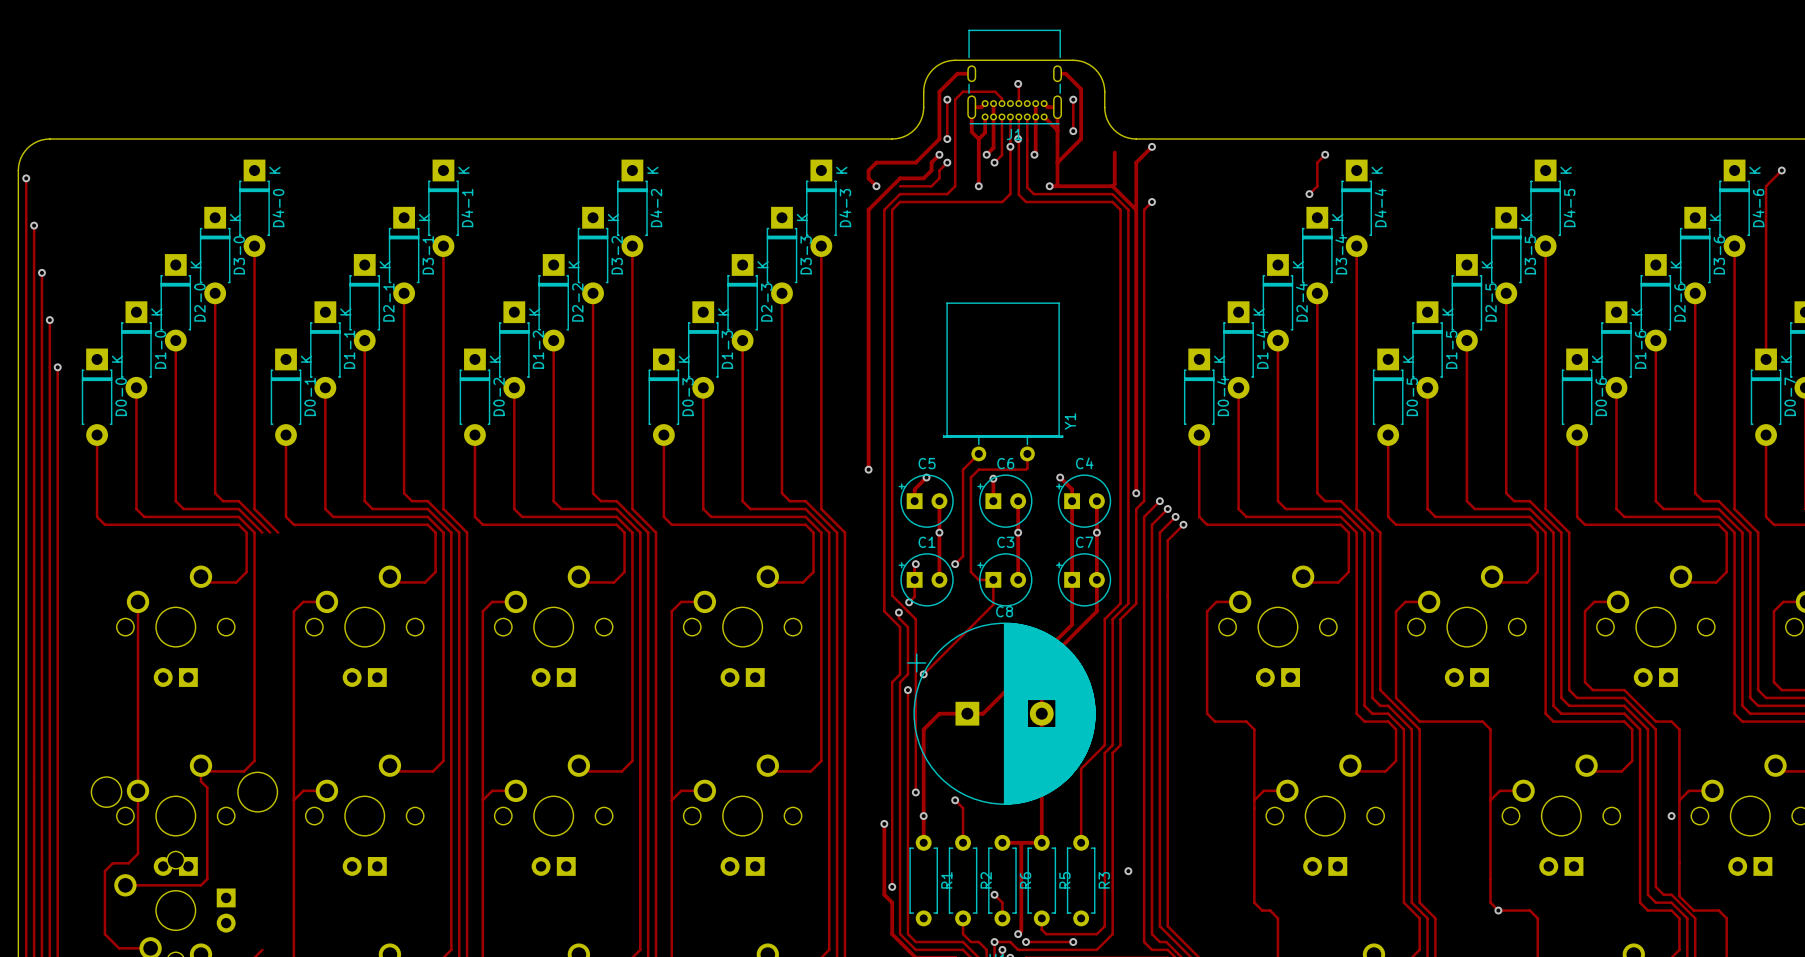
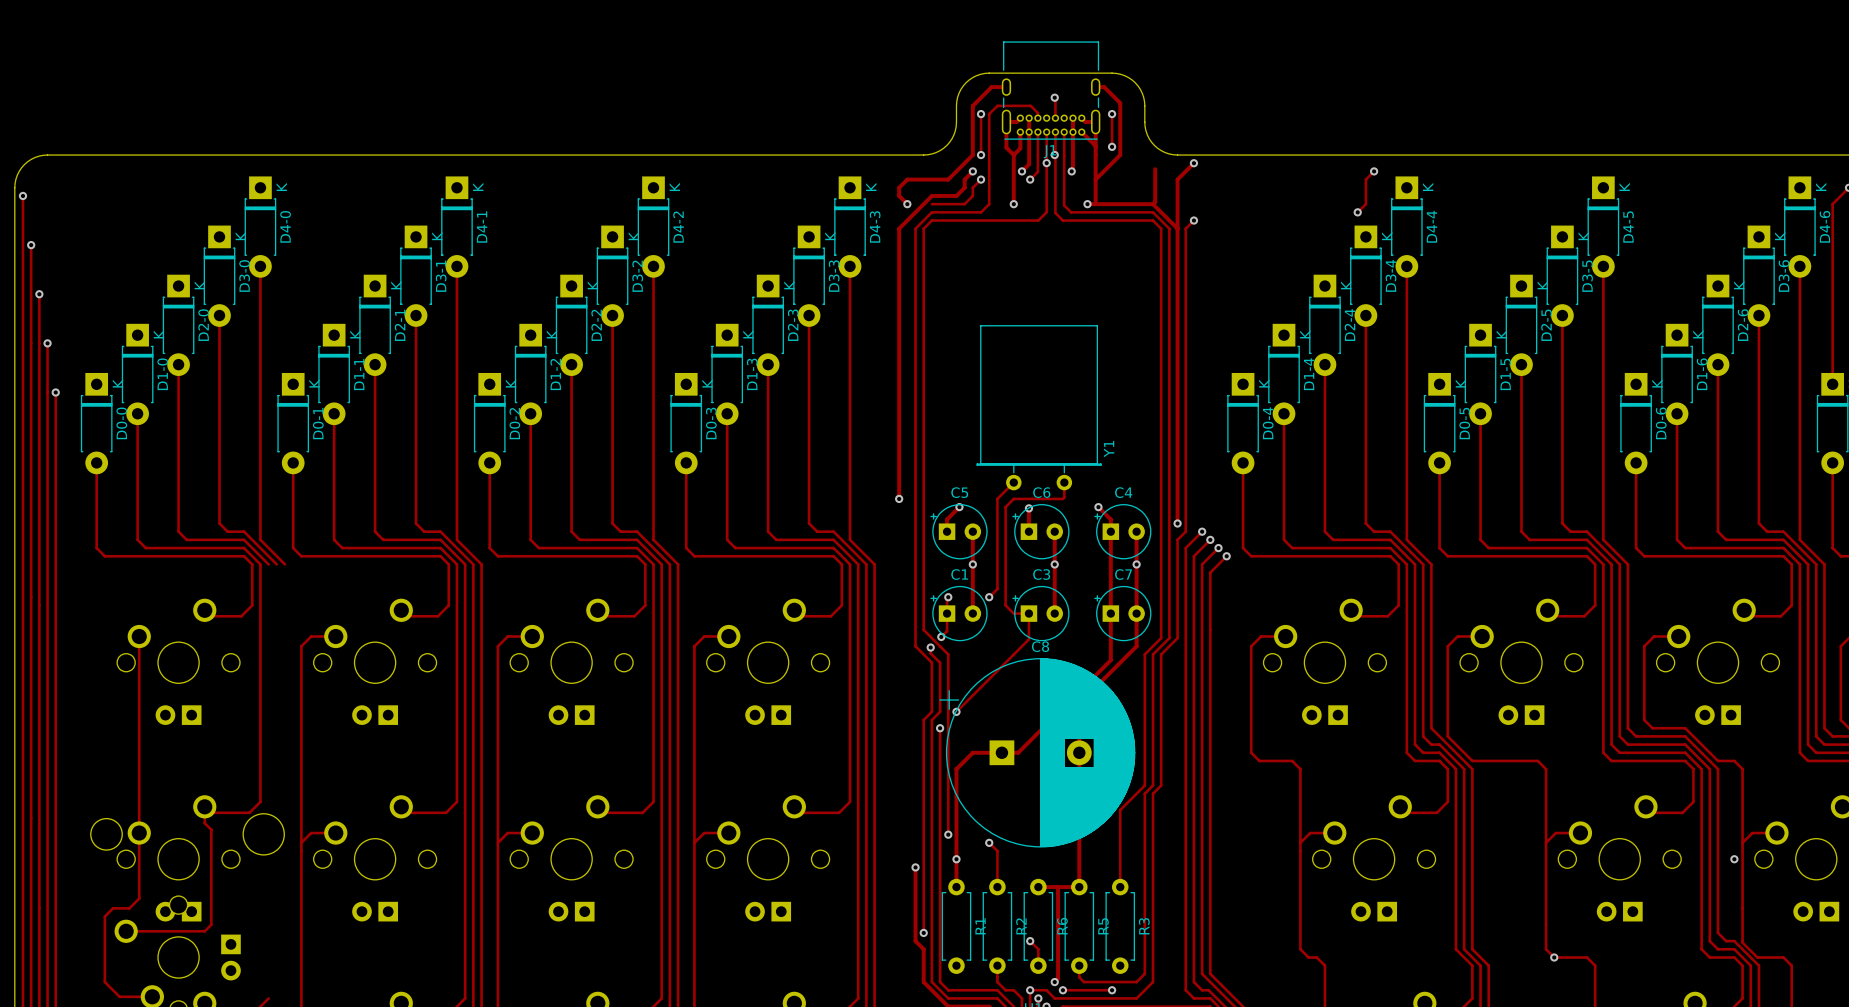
via: (1128, 871) -> none

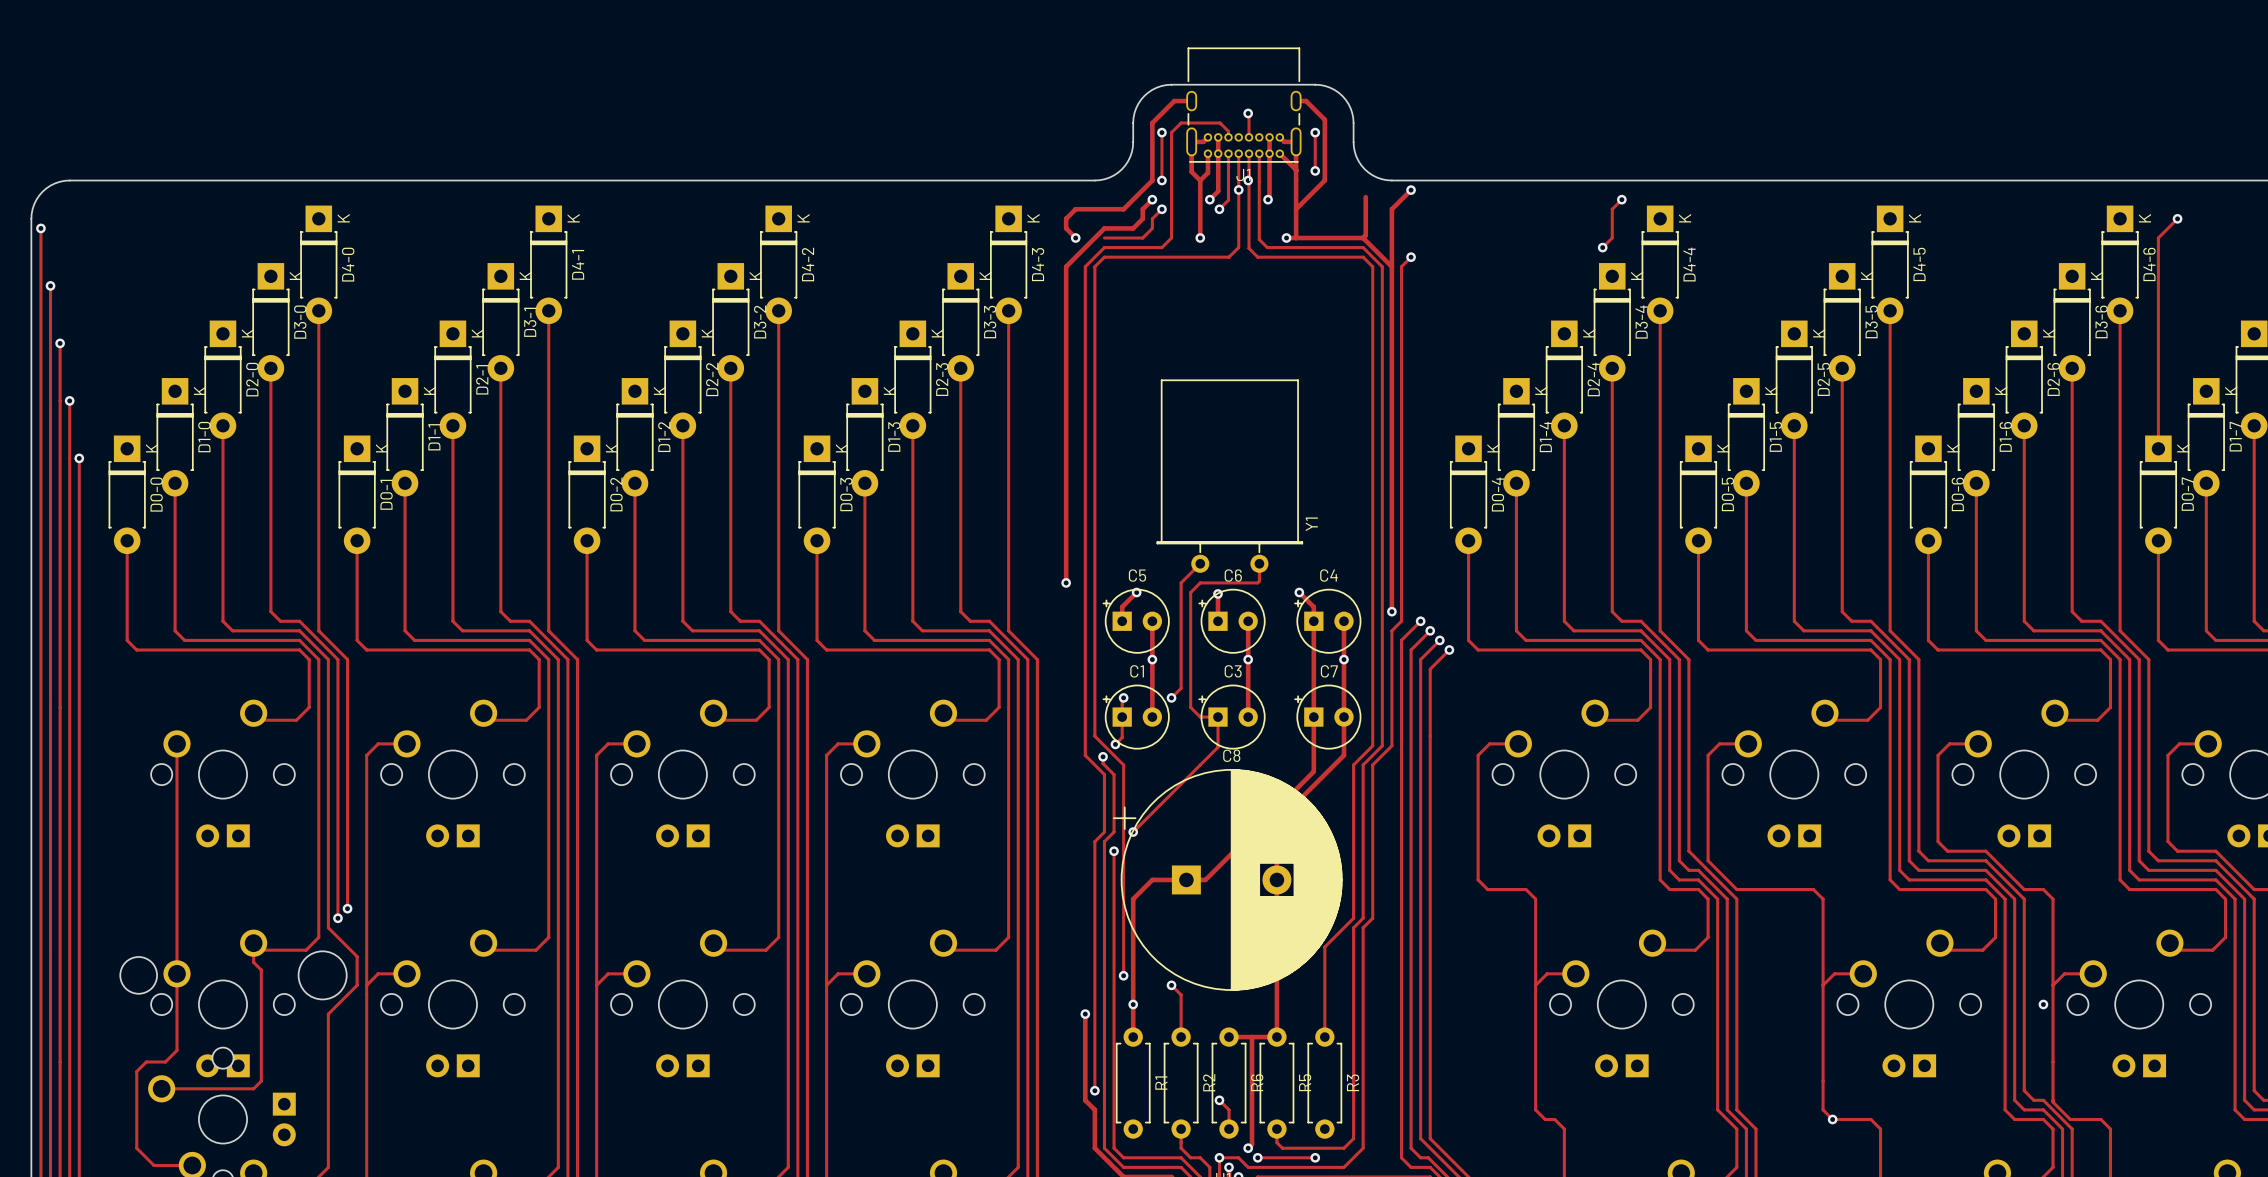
track: none -> (328, 659) (328, 927) (357, 956) (357, 985) (328, 1014) (328, 1167)
track: none -> (337, 659) (337, 918)
track: none -> (347, 659) (347, 908)
via: none -> (347, 908)
via: none -> (337, 918)

